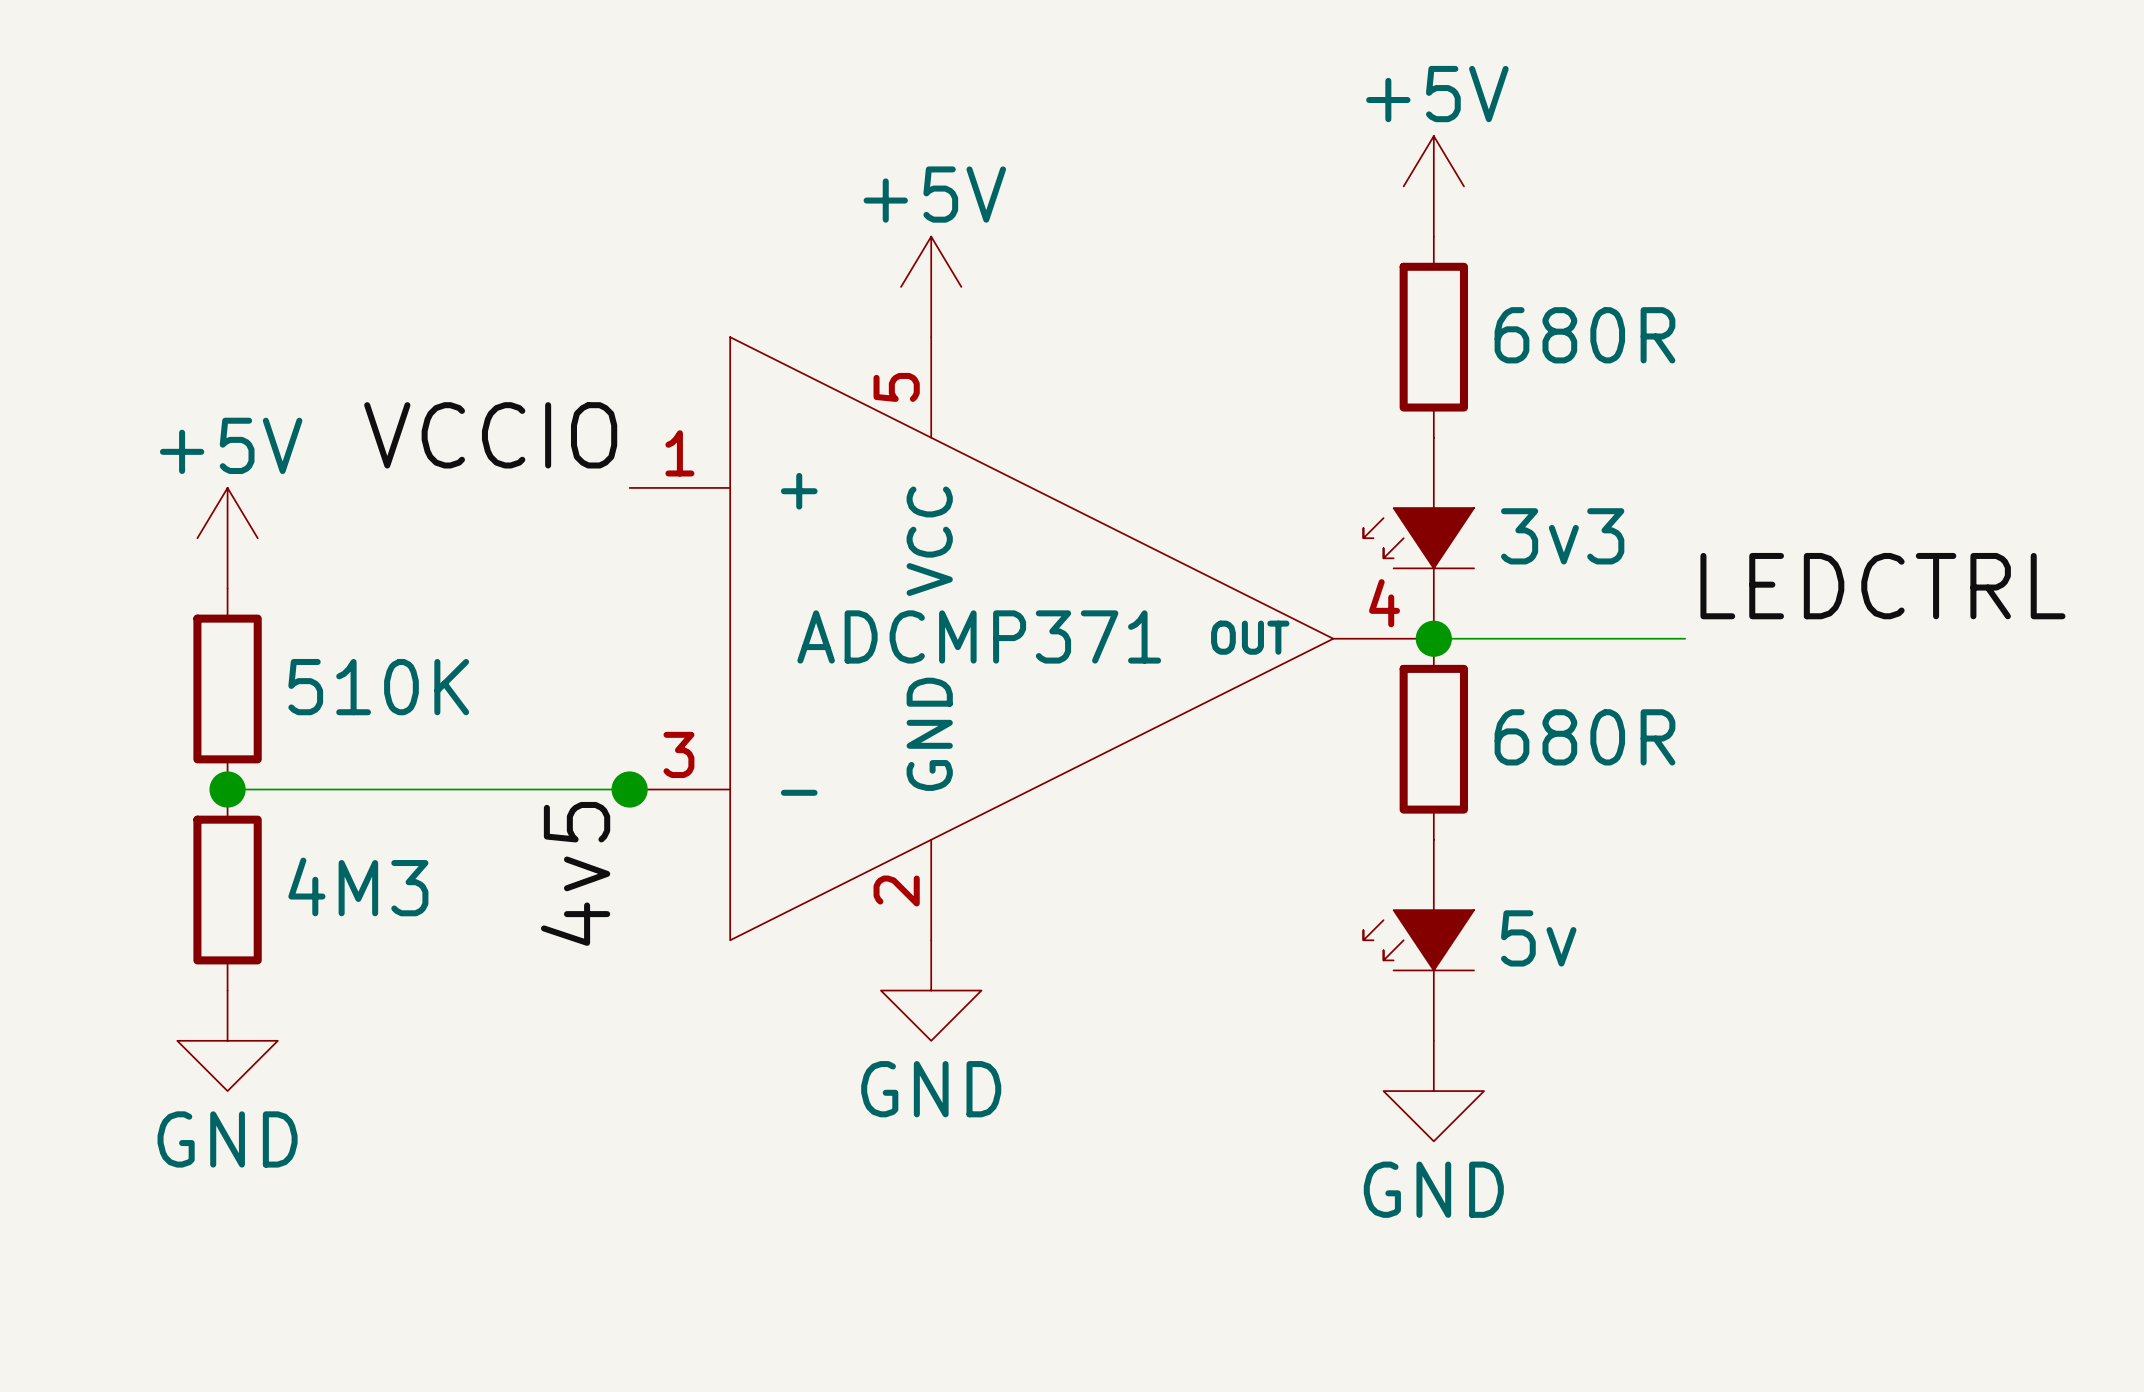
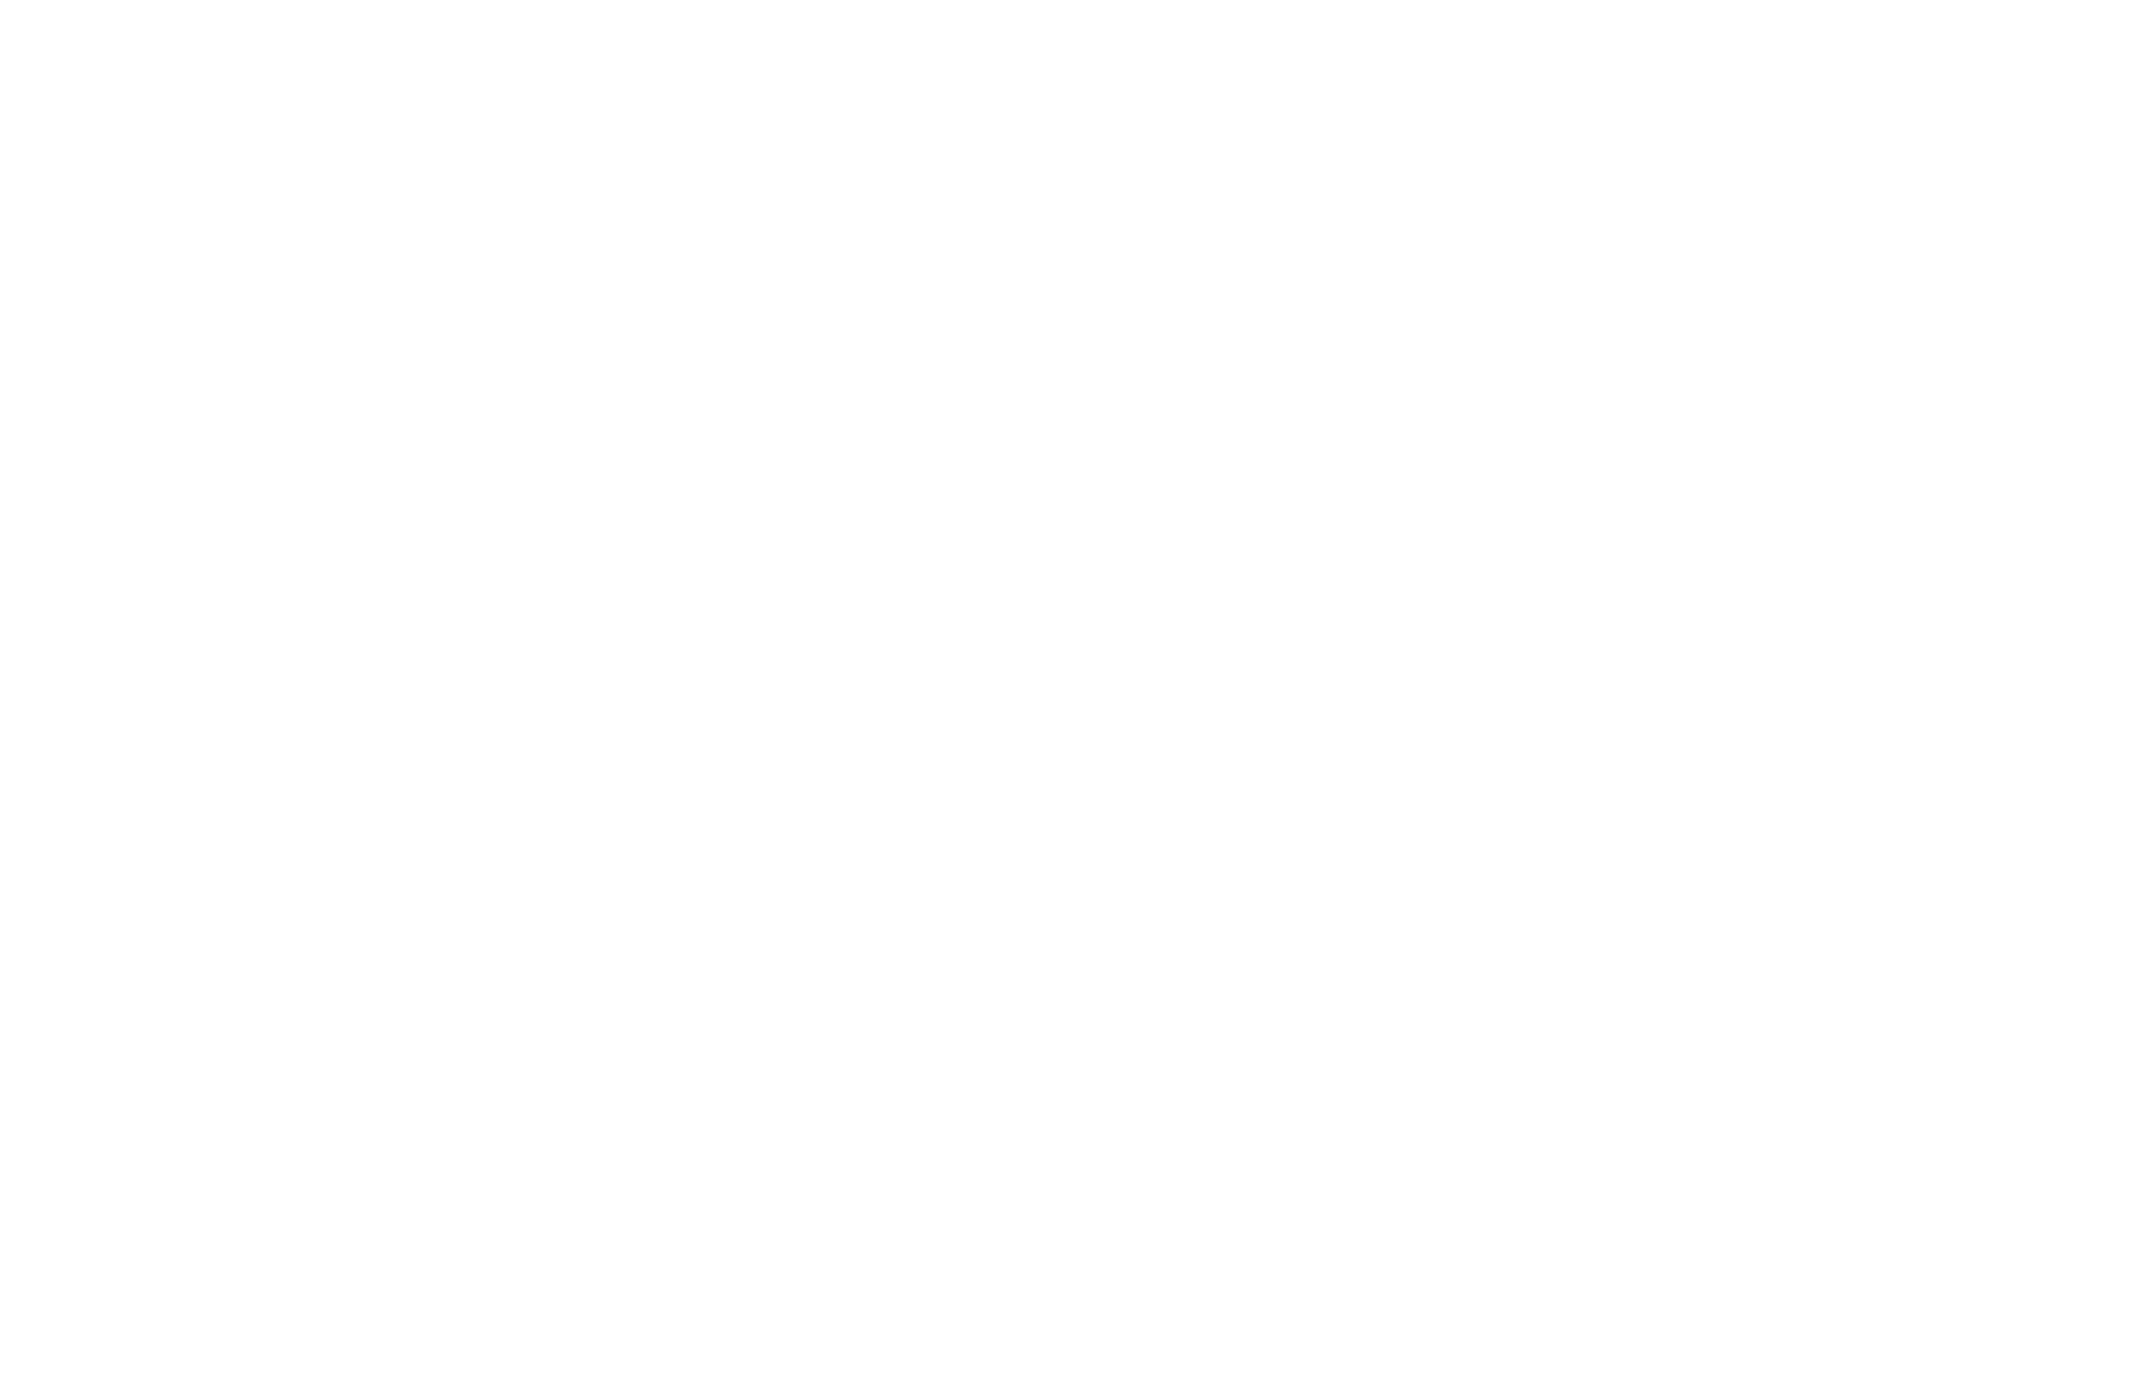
power symbol: +5V (1433, 186) -> none
power symbol: +5V (931, 286) -> none
part: 680R (1433, 337) -> none
label: VCCIO (490, 435) -> none
power symbol: +5V (227, 538) -> none
part: 3v3 (1418, 538) -> none
label: LEDCTRL (1882, 586) -> none
part: ADCMP371 (1031, 638) -> none
wire: (1433, 638) (1685, 638) -> none
junction: (1433, 638) -> none
part: 510K (227, 688) -> none
part: 680R (1433, 739) -> none
wire: (227, 789) (629, 789) -> none
junction: (227, 789) -> none
junction: (629, 789) -> none
label: 4v5 (575, 873) -> none
part: 4M3 (227, 890) -> none
part: 5v (1418, 940) -> none
power symbol: GND (931, 990) -> none
power symbol: GND (227, 1040) -> none
power symbol: GND (1433, 1091) -> none

